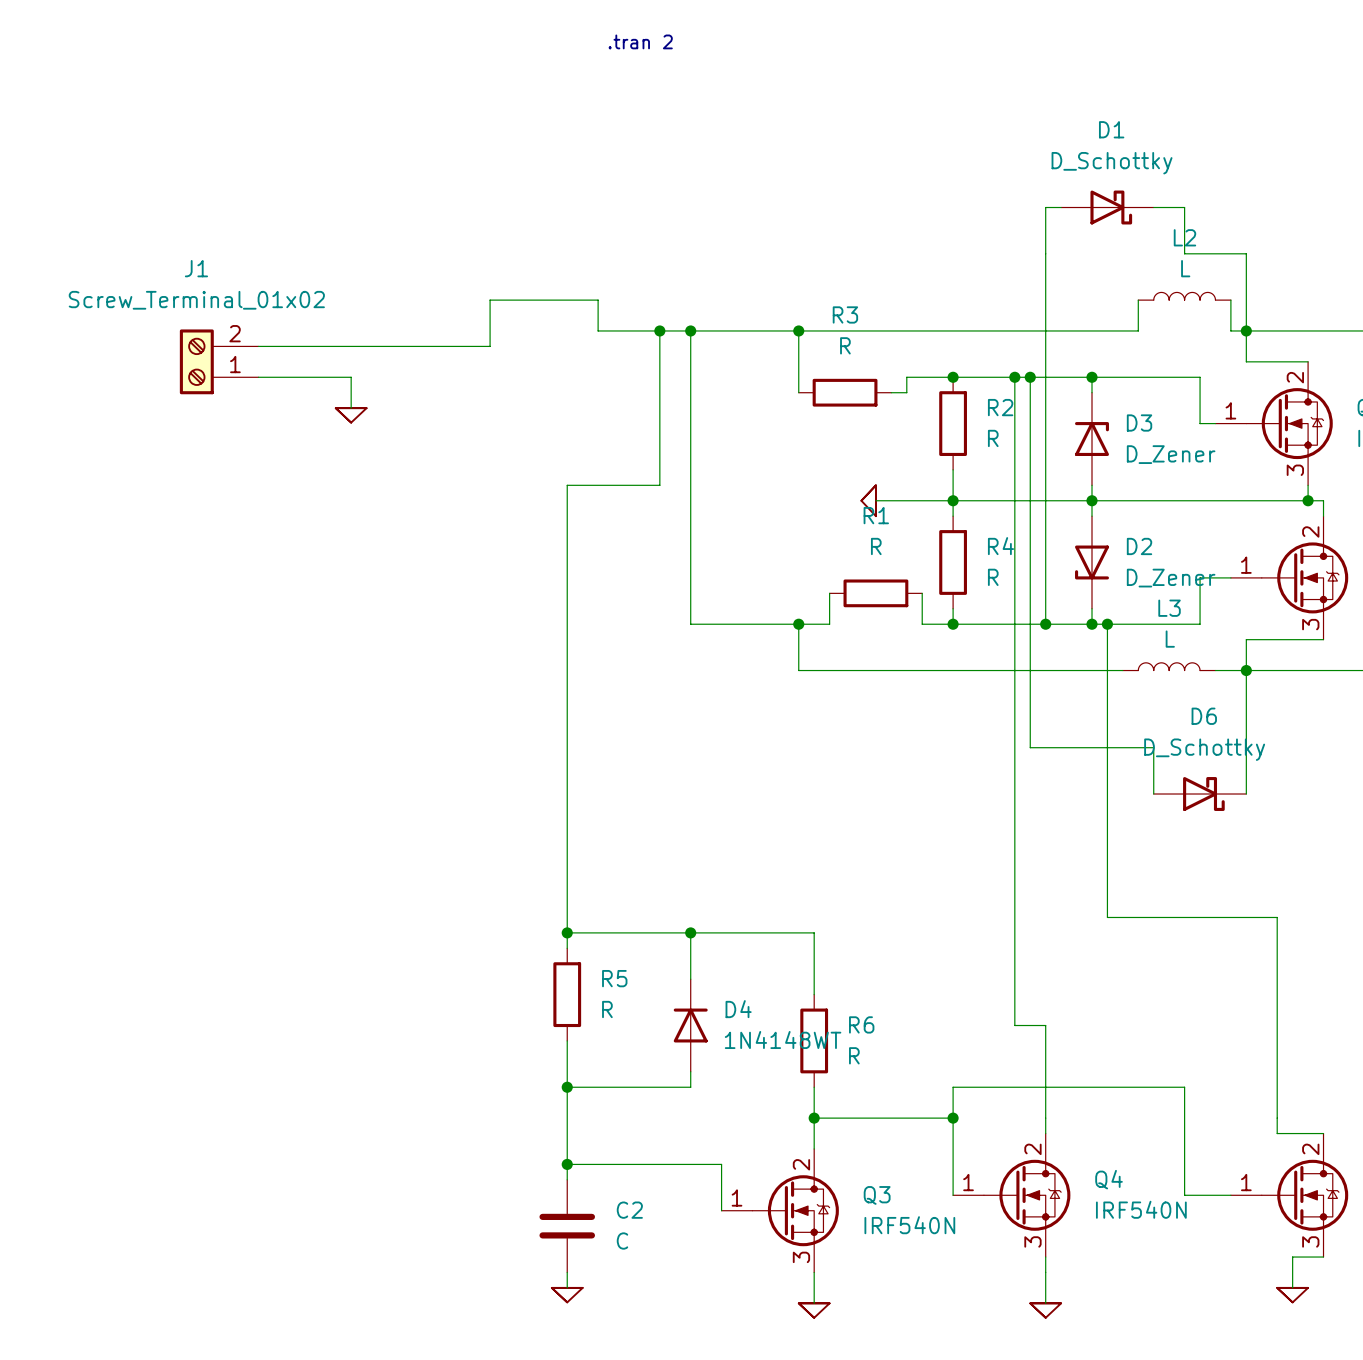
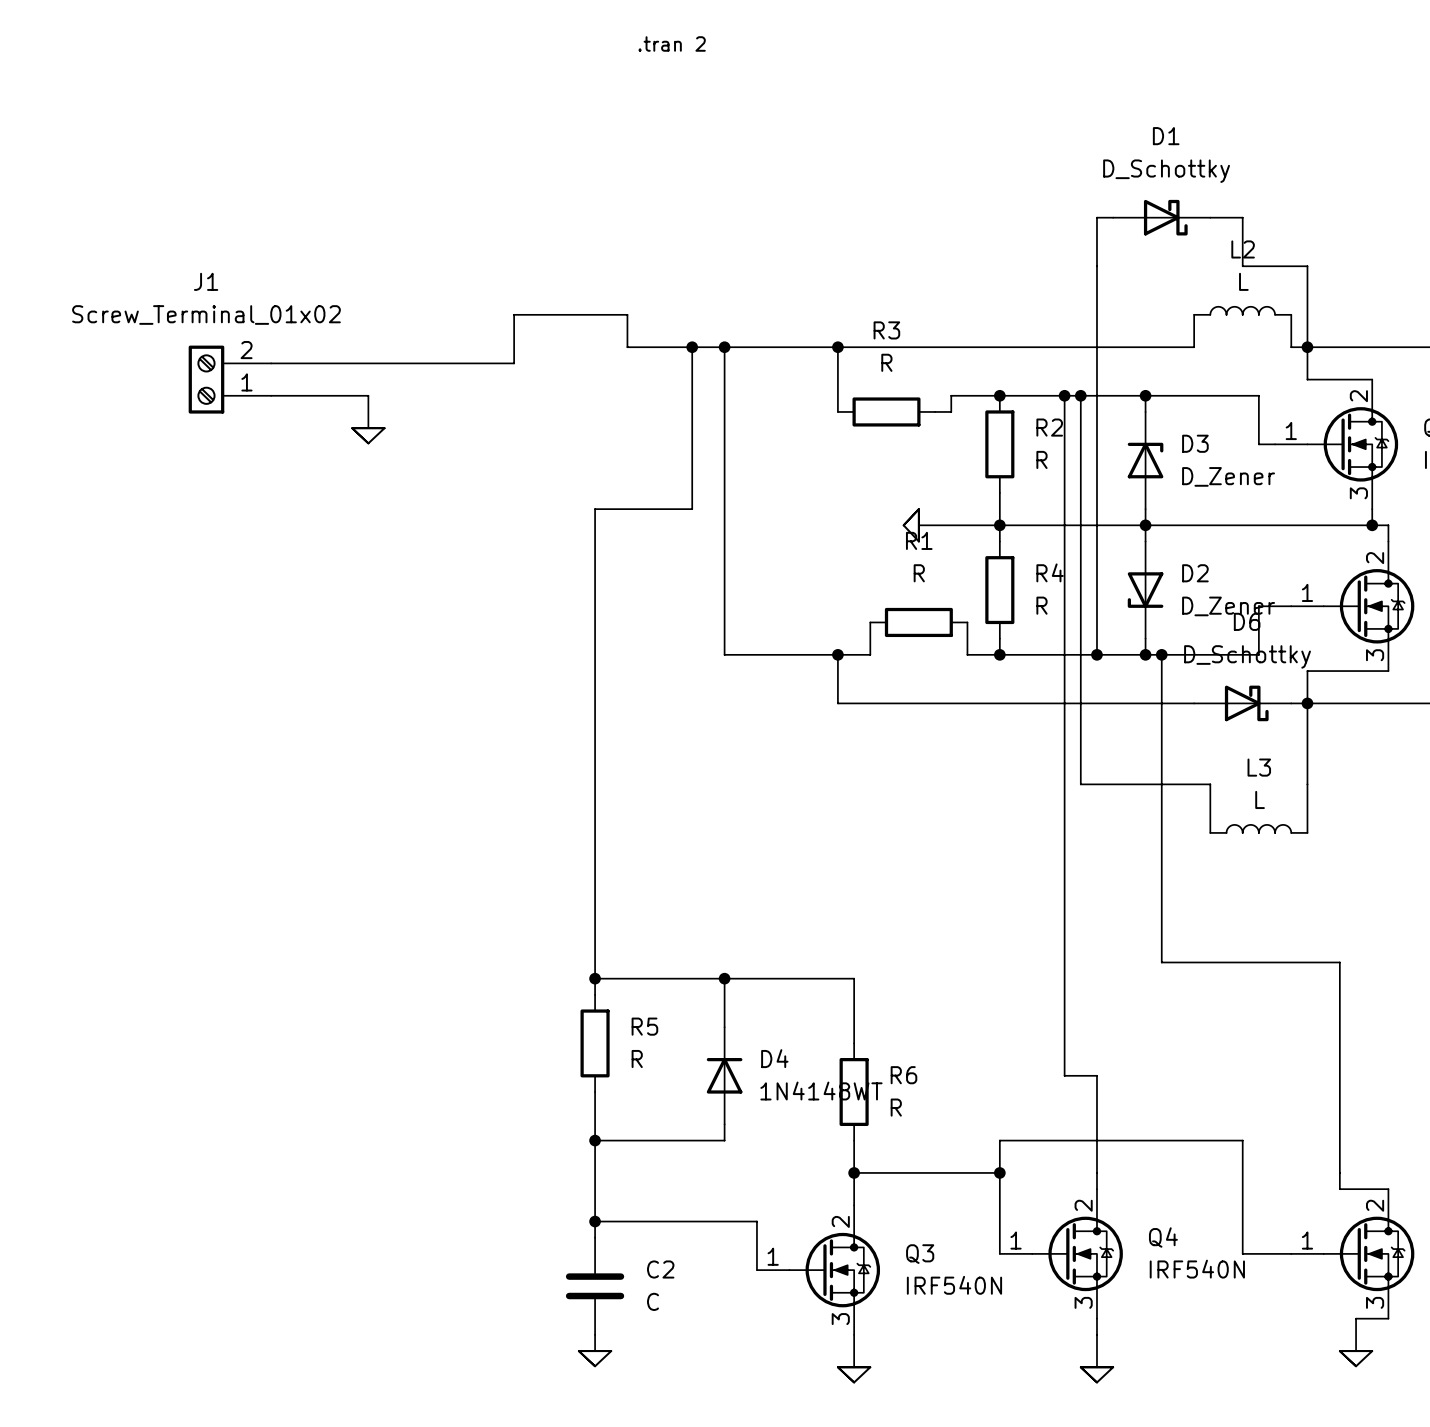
L3 position: (1169, 666) -> (1258, 828)
D6 position: (1200, 794) -> (1242, 703)

